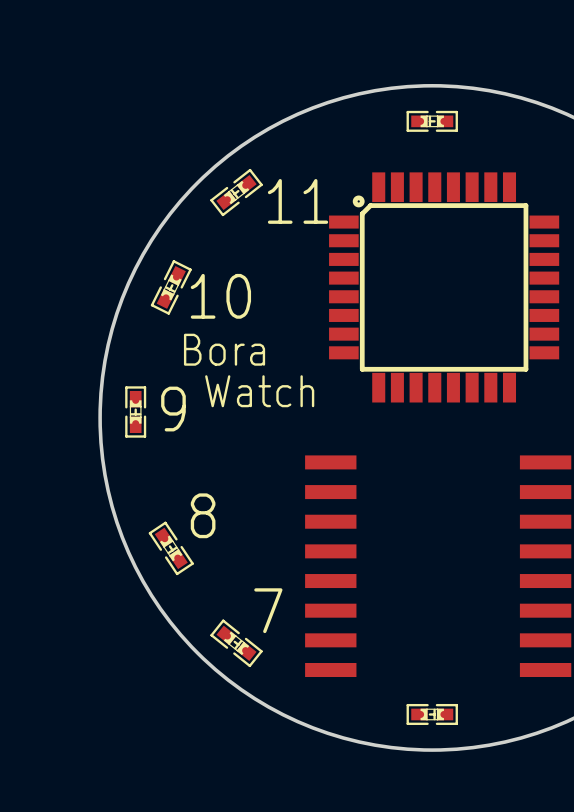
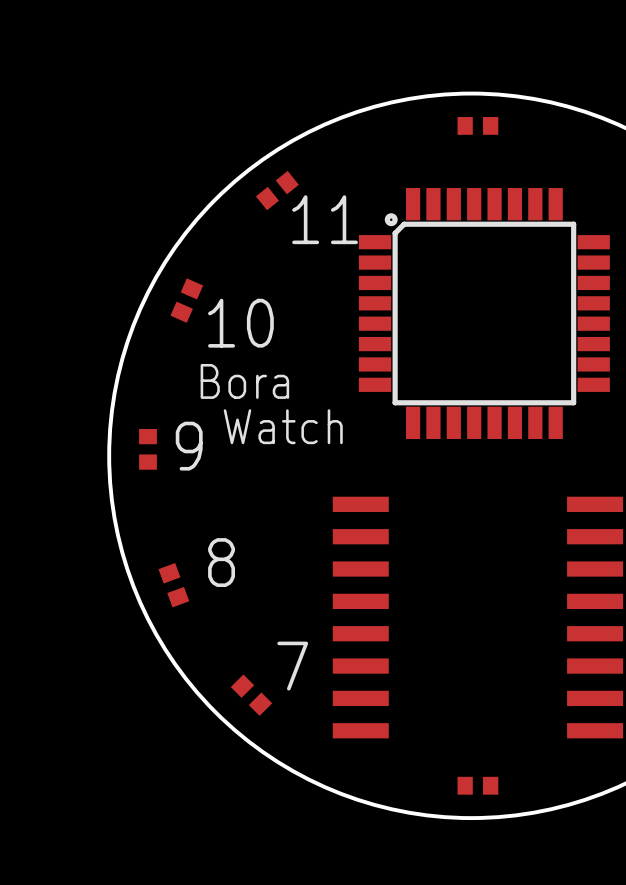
part footprint: [406, 110, 458, 132] -> [457, 116, 499, 135]
part: none -> (277, 190)
part: (236, 192) -> none
part footprint: [150, 260, 192, 315] -> [170, 278, 204, 323]
part footprint: [125, 386, 147, 438] -> [139, 428, 157, 470]
part footprint: [148, 521, 194, 576] -> [158, 563, 190, 608]
part footprint: [210, 619, 263, 668] -> [230, 674, 273, 716]
part footprint: [406, 703, 458, 725] -> [457, 776, 499, 795]

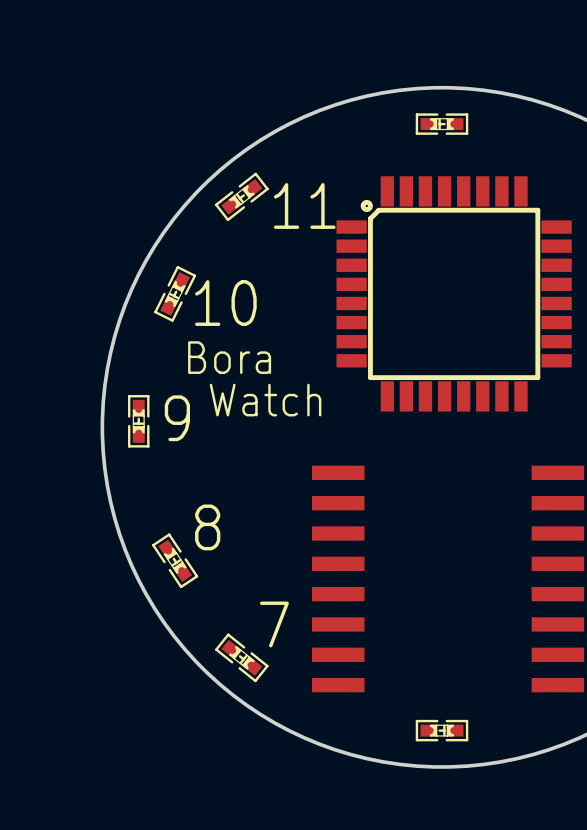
part footprint: [457, 116, 499, 135] -> [415, 113, 469, 135]
part: (277, 190) -> none
part: none -> (241, 196)
part footprint: [170, 278, 204, 323] -> [154, 266, 197, 322]
part footprint: [139, 428, 157, 470] -> [128, 395, 150, 448]
part footprint: [158, 563, 190, 608] -> [152, 533, 199, 589]
part footprint: [230, 674, 273, 716] -> [215, 633, 269, 683]
part footprint: [457, 776, 499, 795] -> [415, 719, 469, 742]

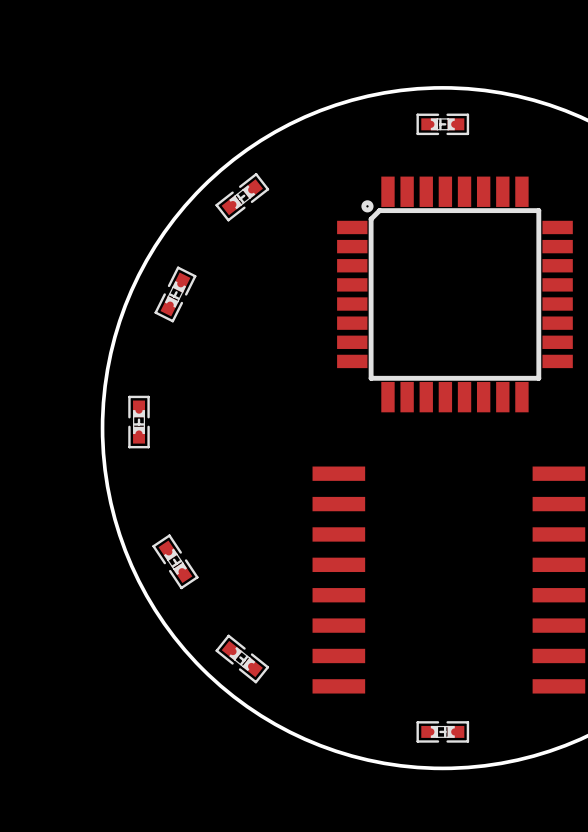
text: 11 (304, 205) -> none
text: 10 (225, 303) -> none
text: Bora (229, 357) -> none
text: Watch (265, 400) -> none
text: 9 (177, 418) -> none
text: 8 (207, 527) -> none
text: 7 (274, 624) -> none

